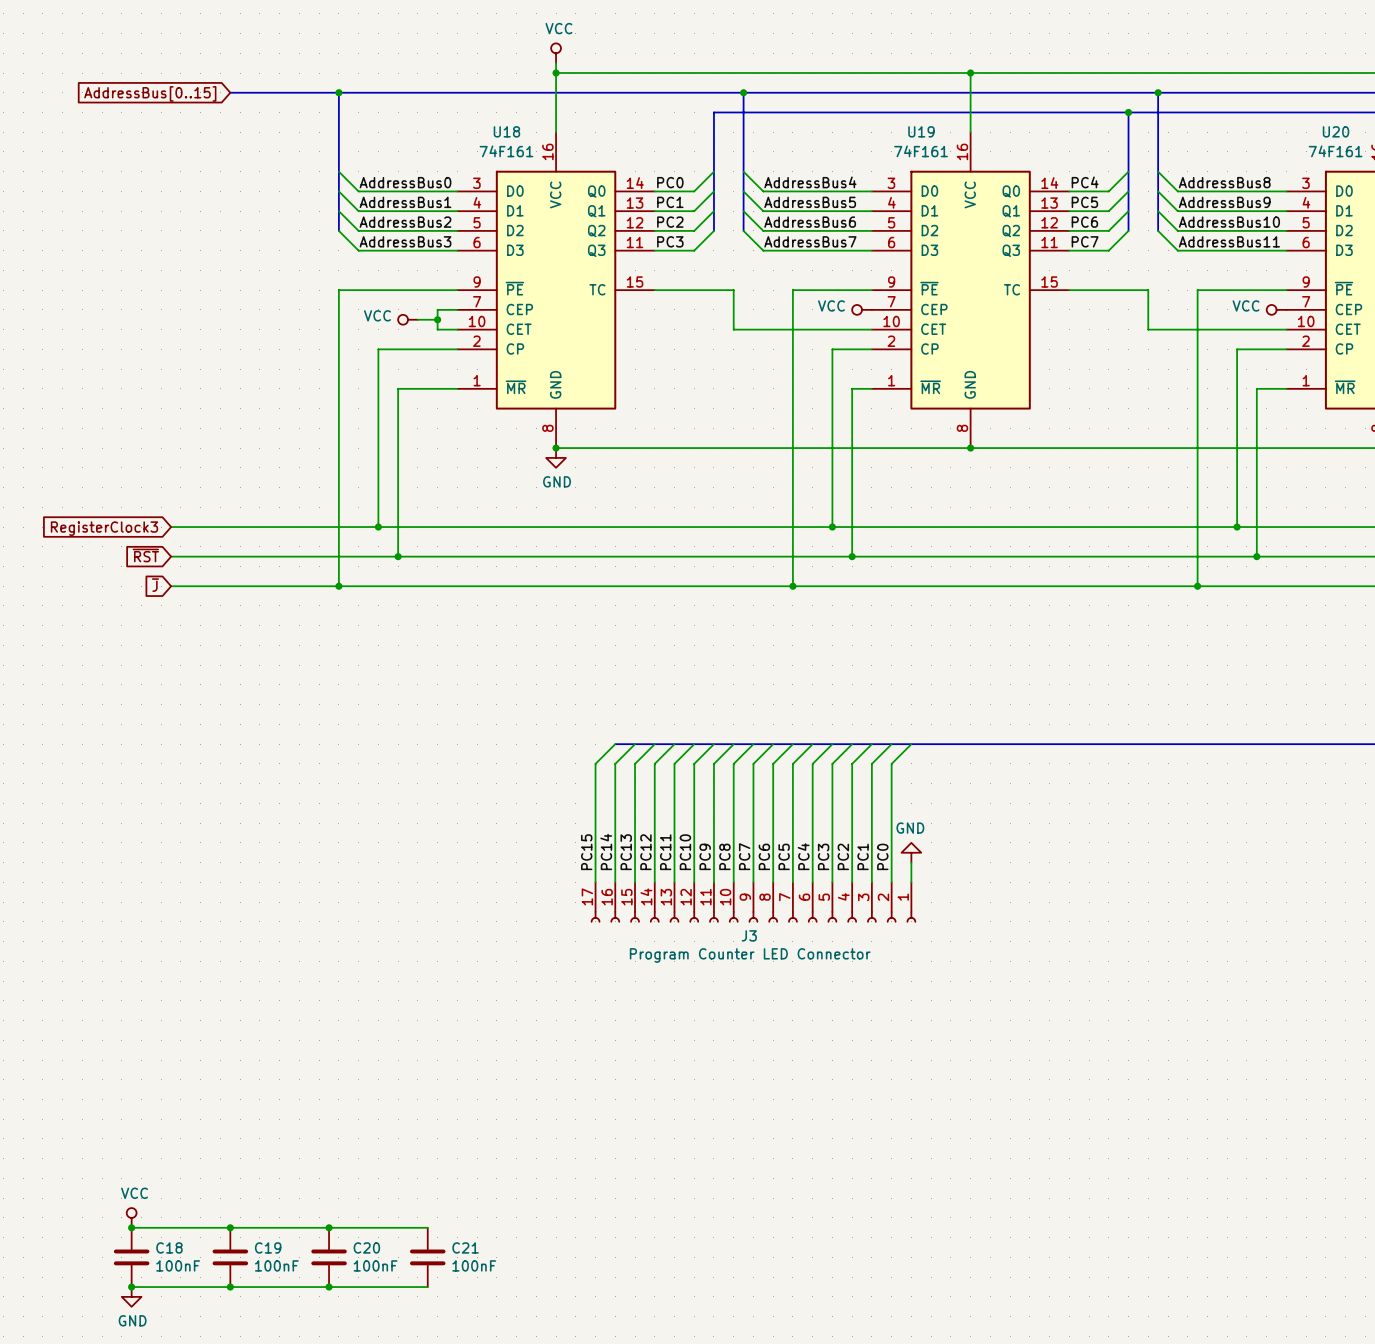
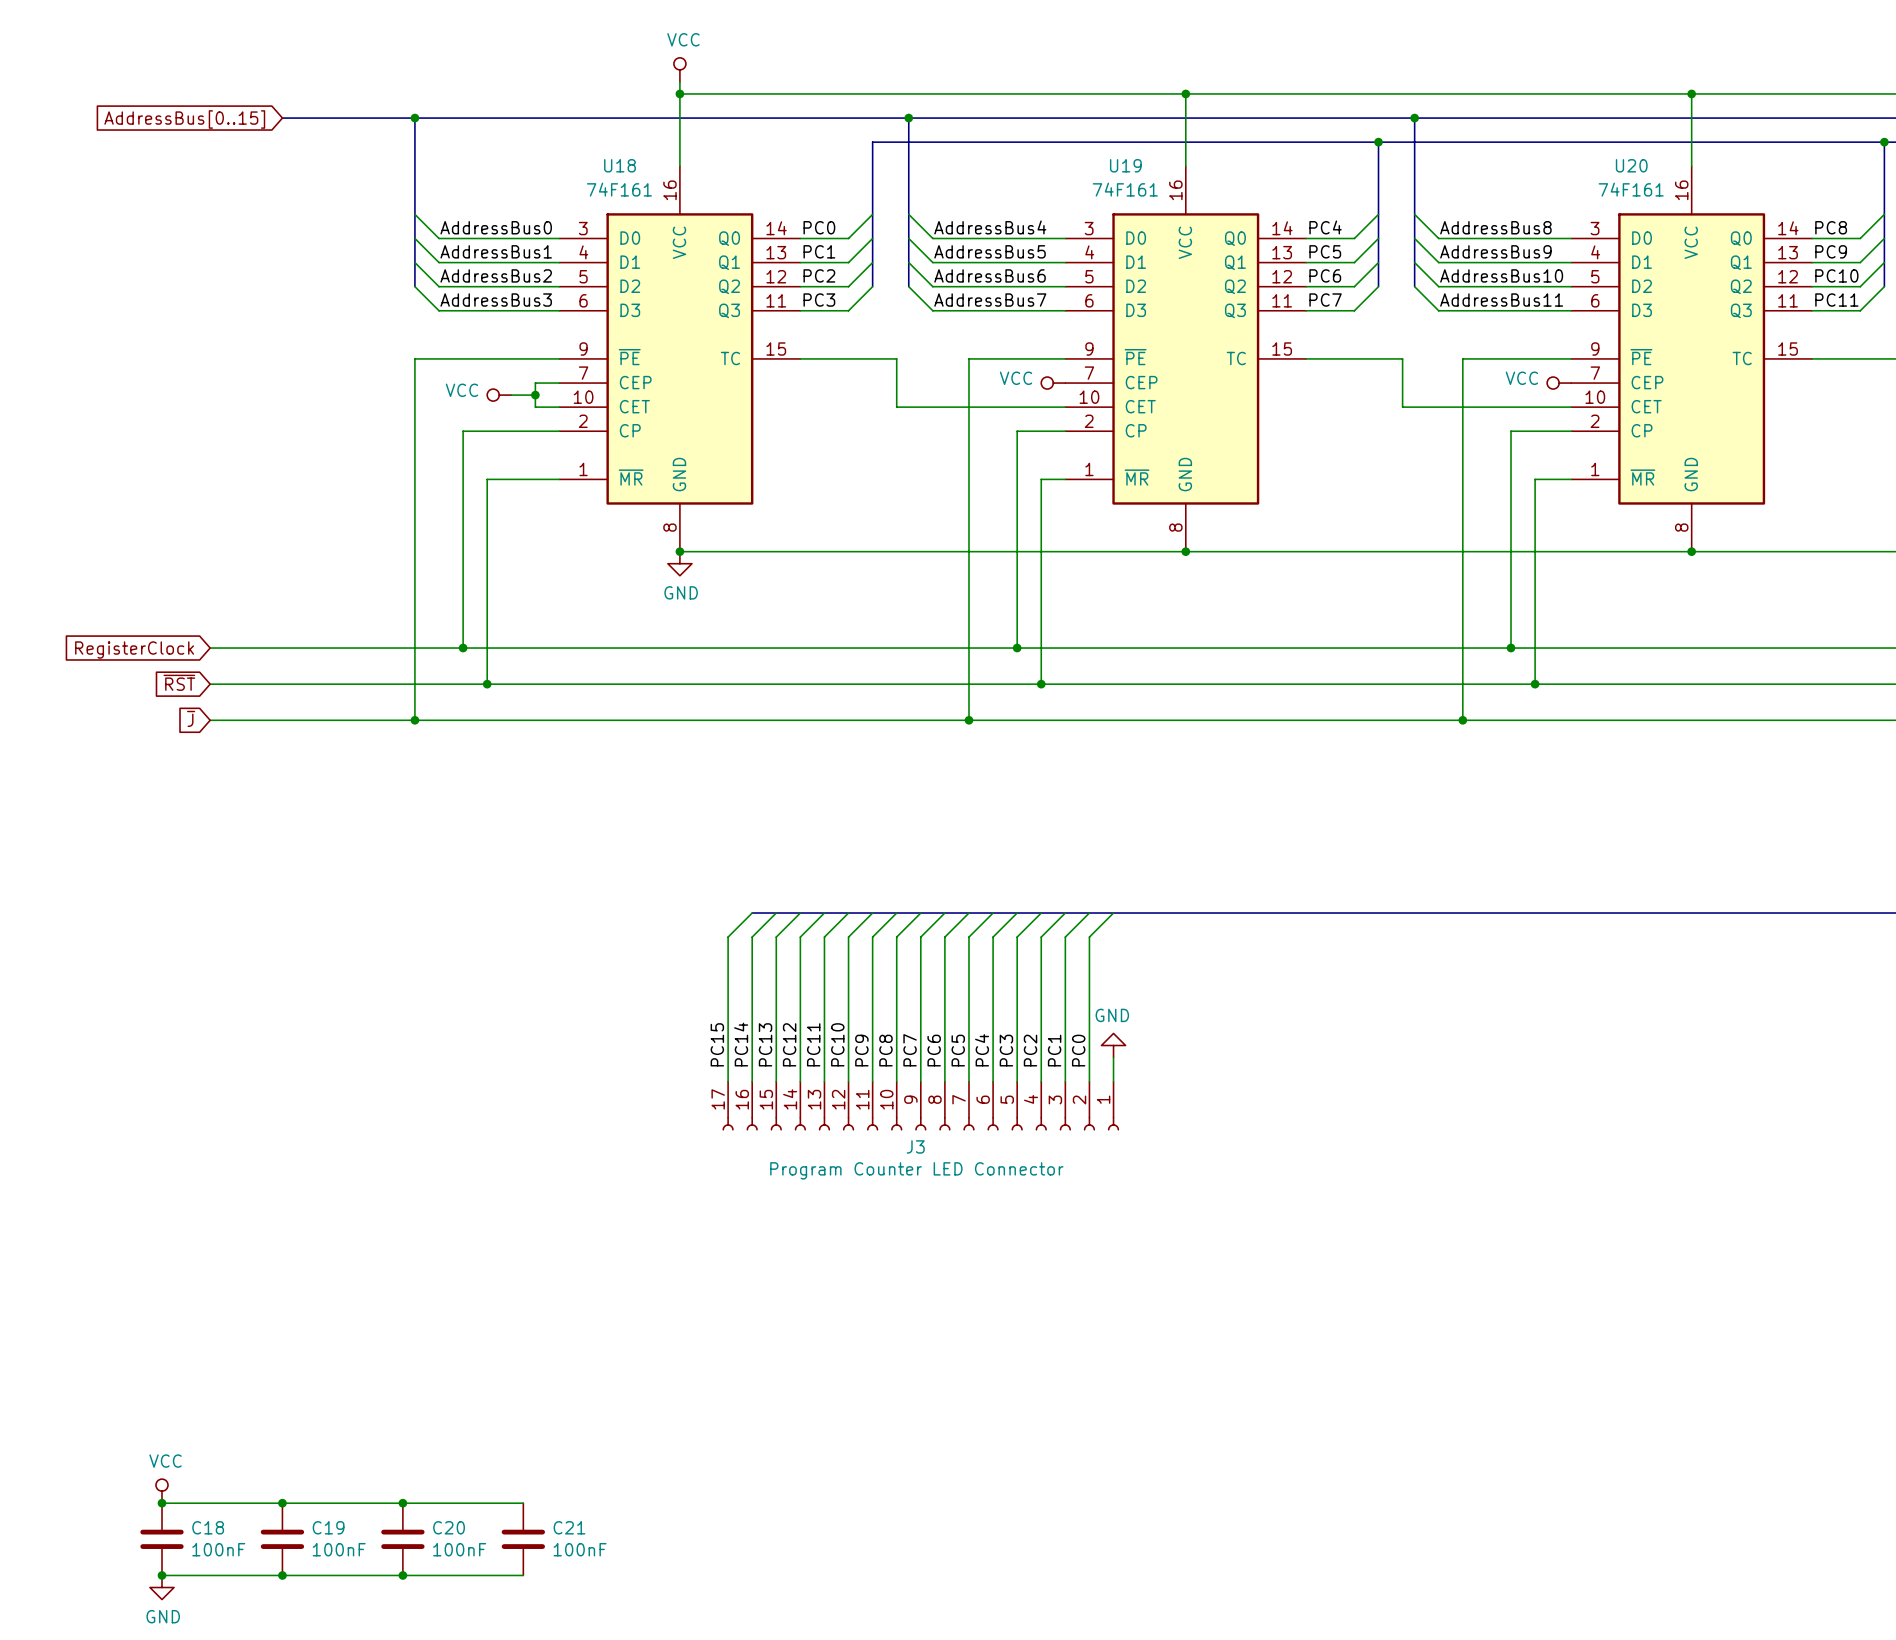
global label: RegisterClock3 (104, 528) -> RegisterClock (134, 650)

